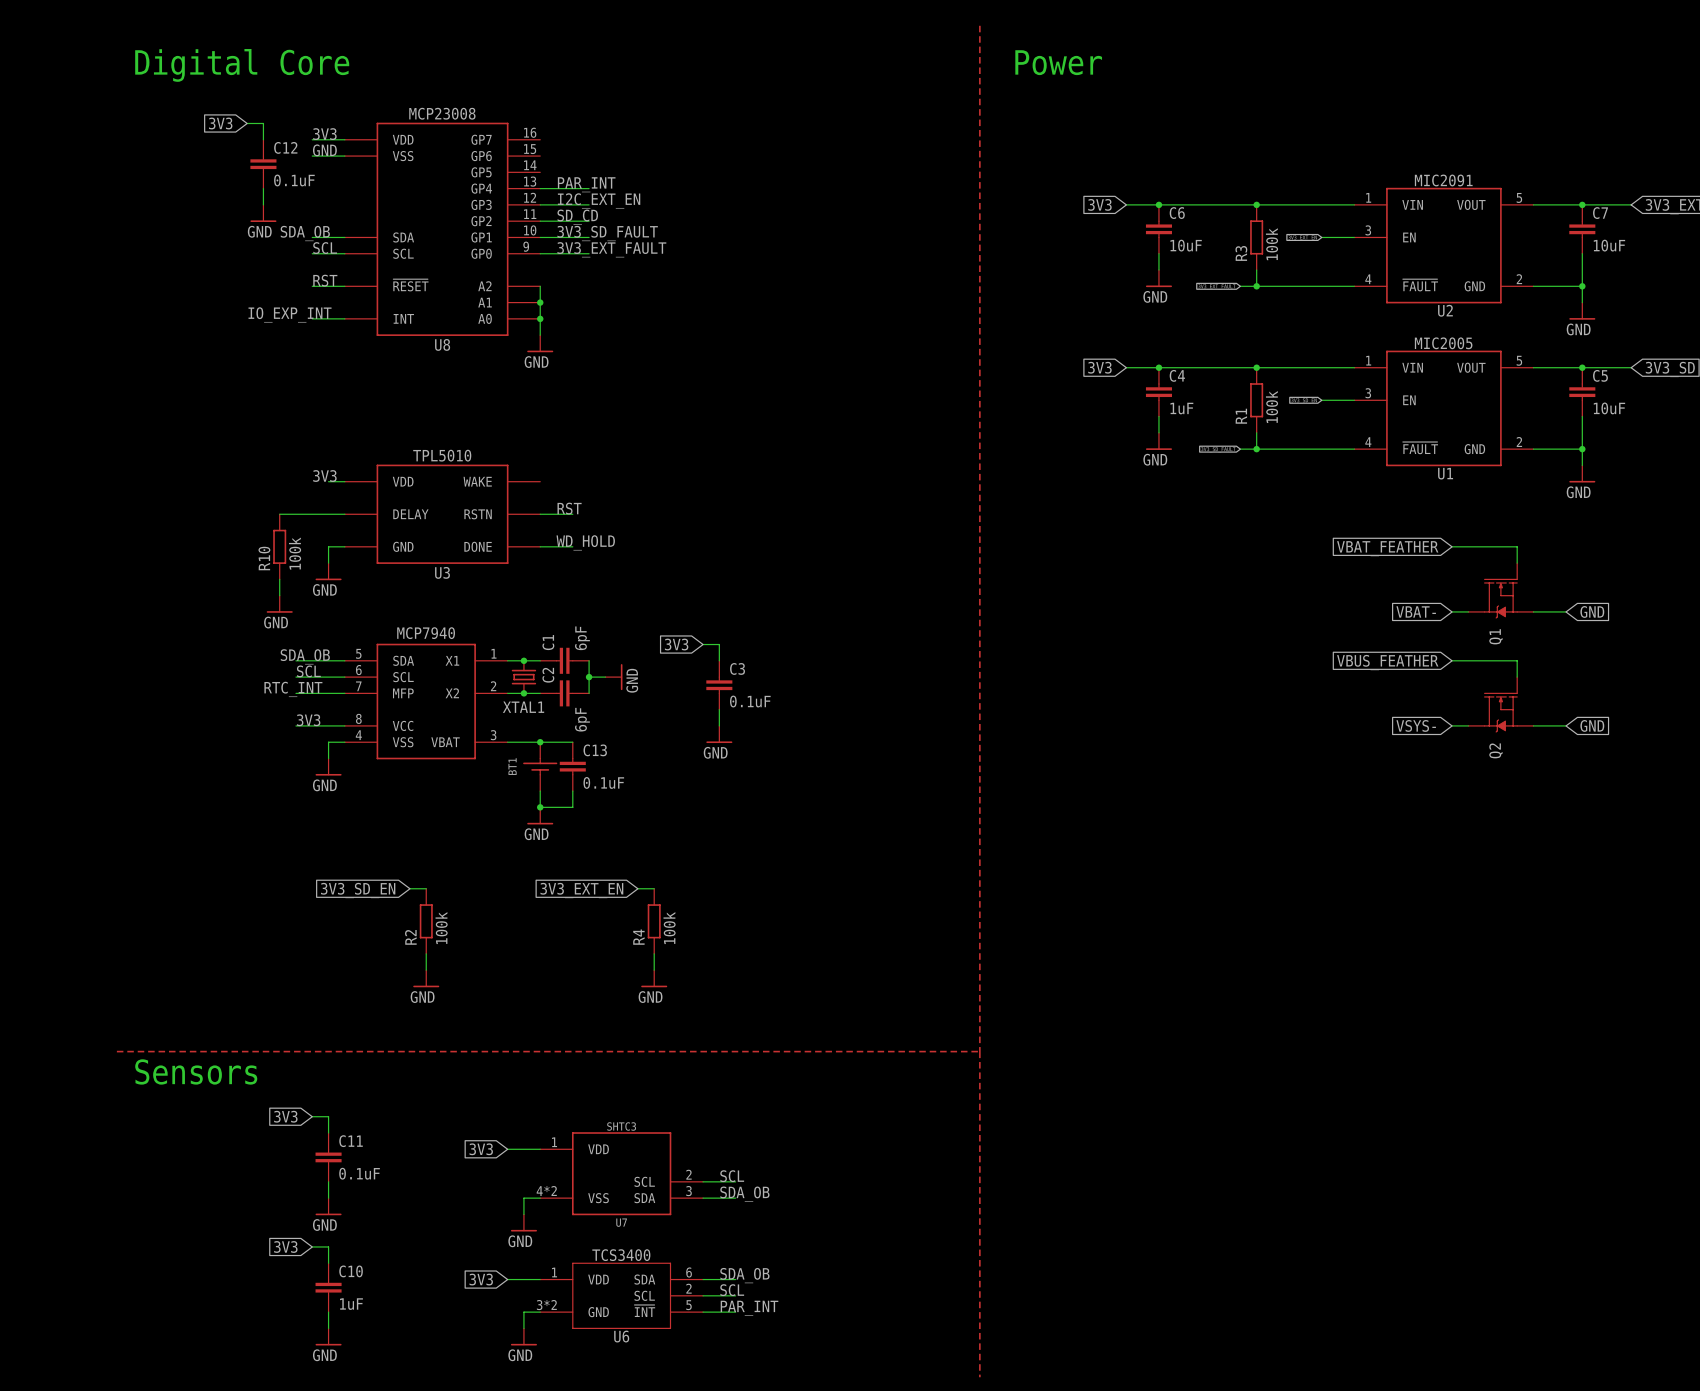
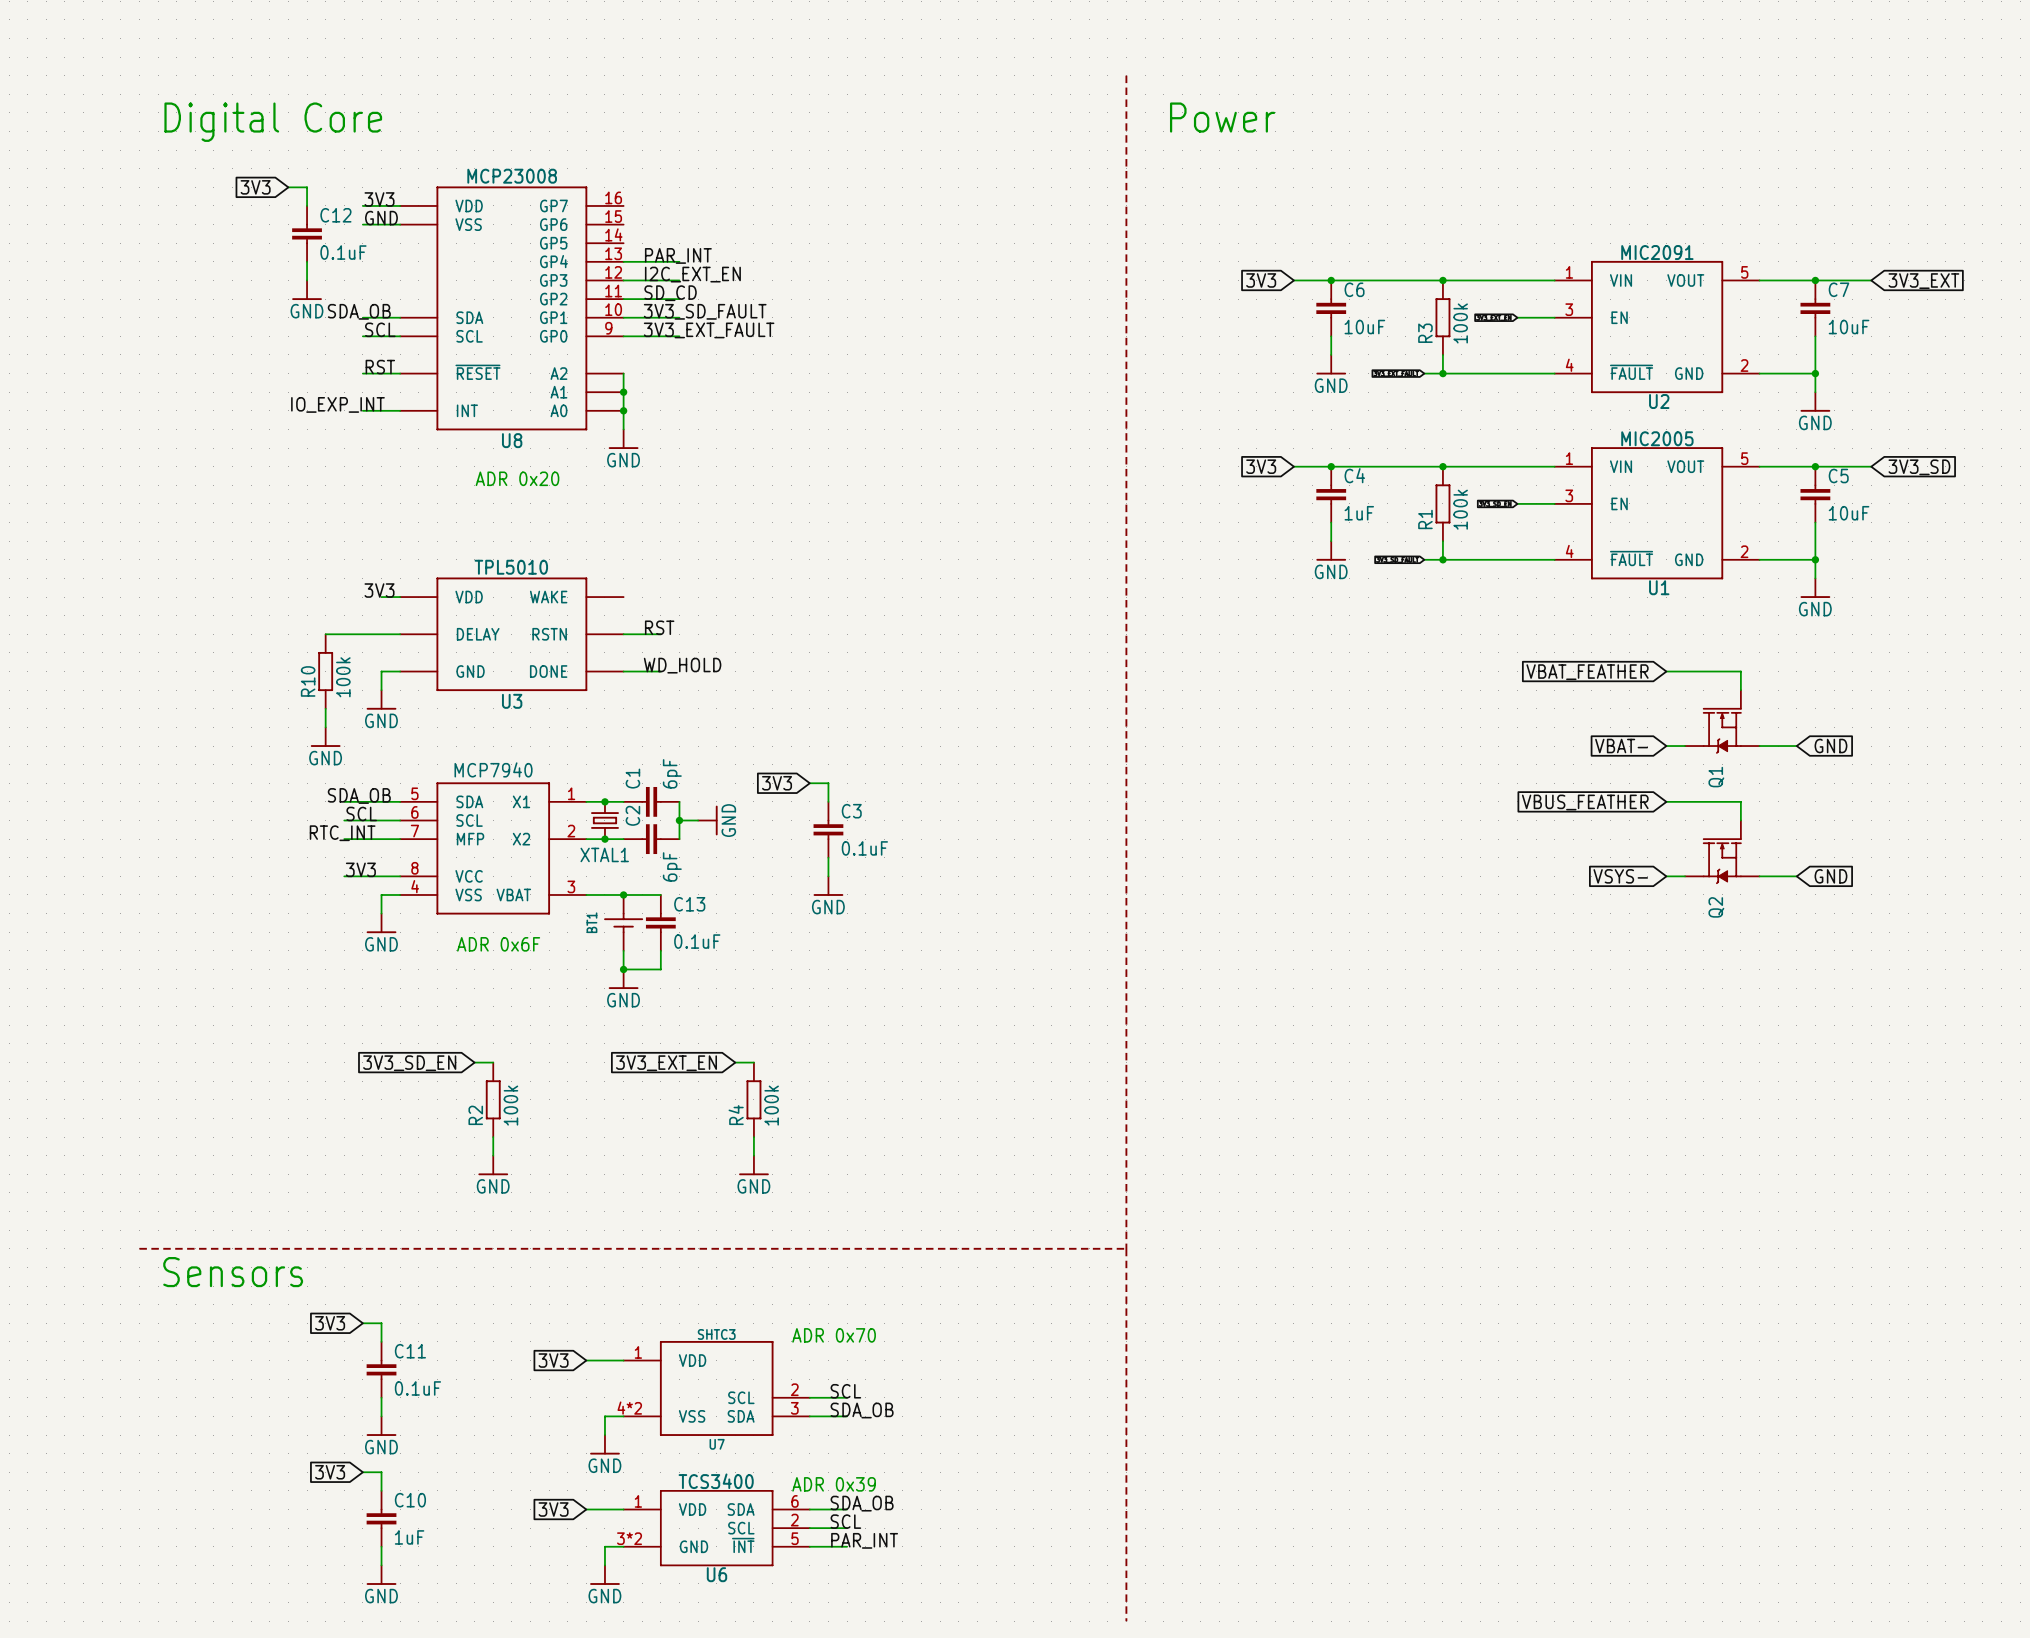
text: none -> ADR 0x20 (517, 478)
text: none -> ADR 0x6F (498, 944)
text: none -> ADR 0x70 (834, 1335)
text: none -> ADR 0x39 (834, 1484)

